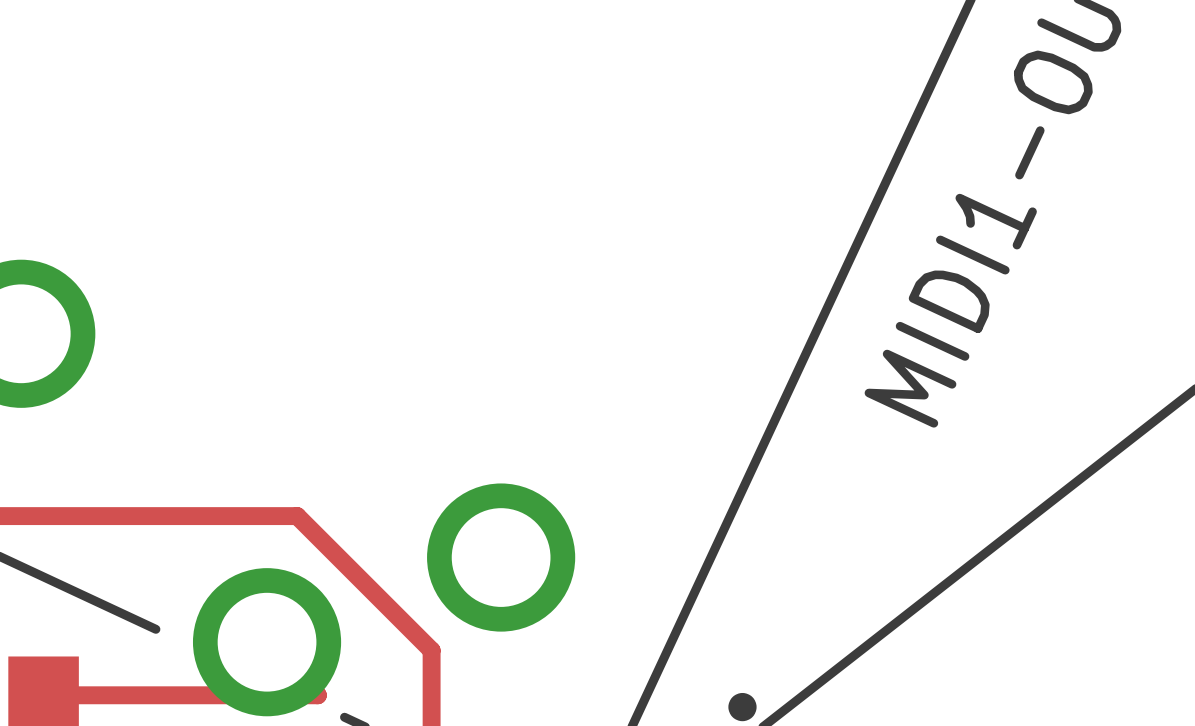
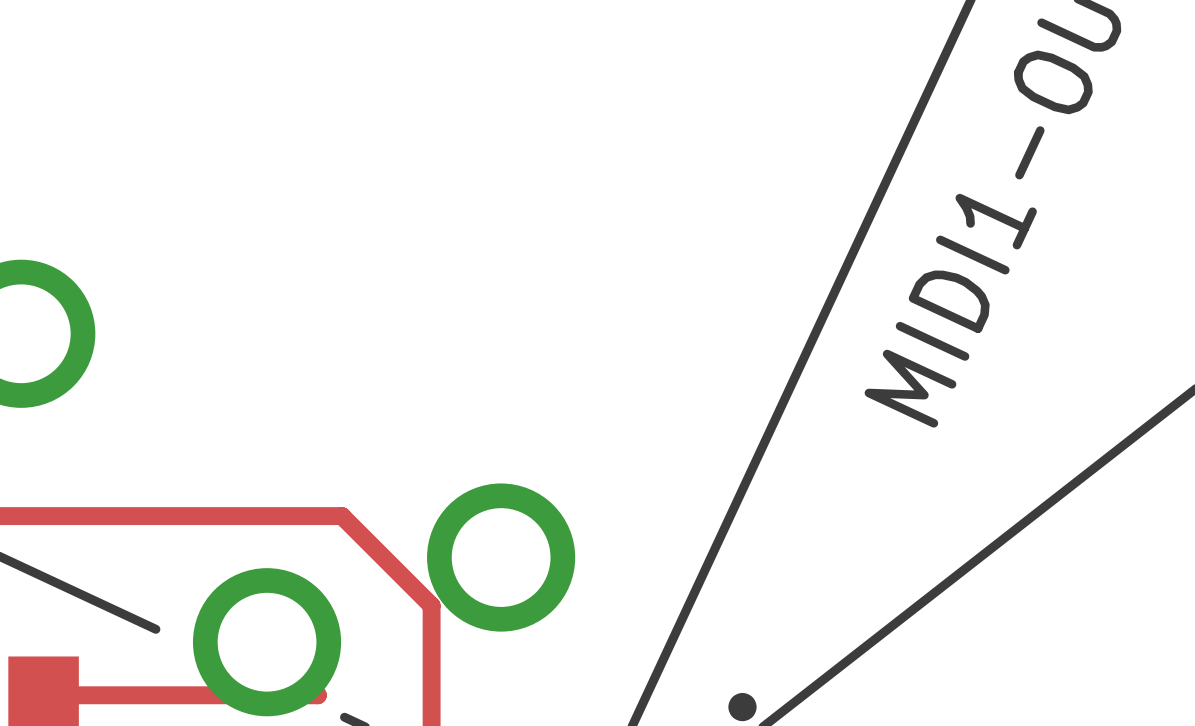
top track: (297, 516) (431, 650) -> (297, 516) (342, 516) (431, 605) (431, 650)

